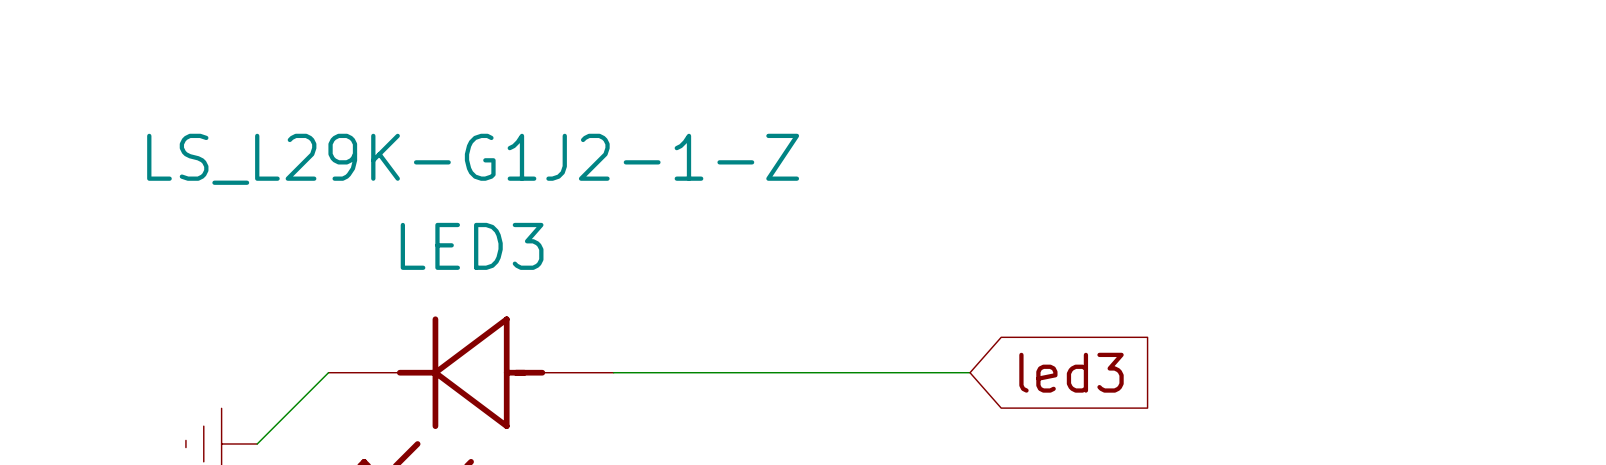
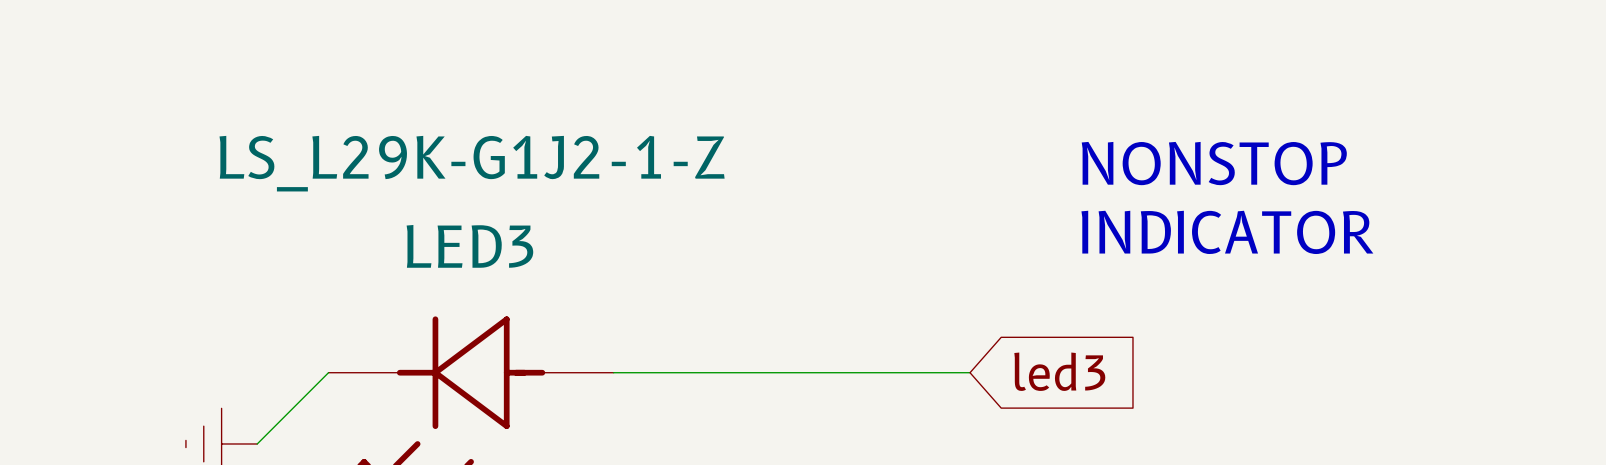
text: none -> NONSTOP (1214, 163)
text: none -> INDICATOR (1227, 232)

